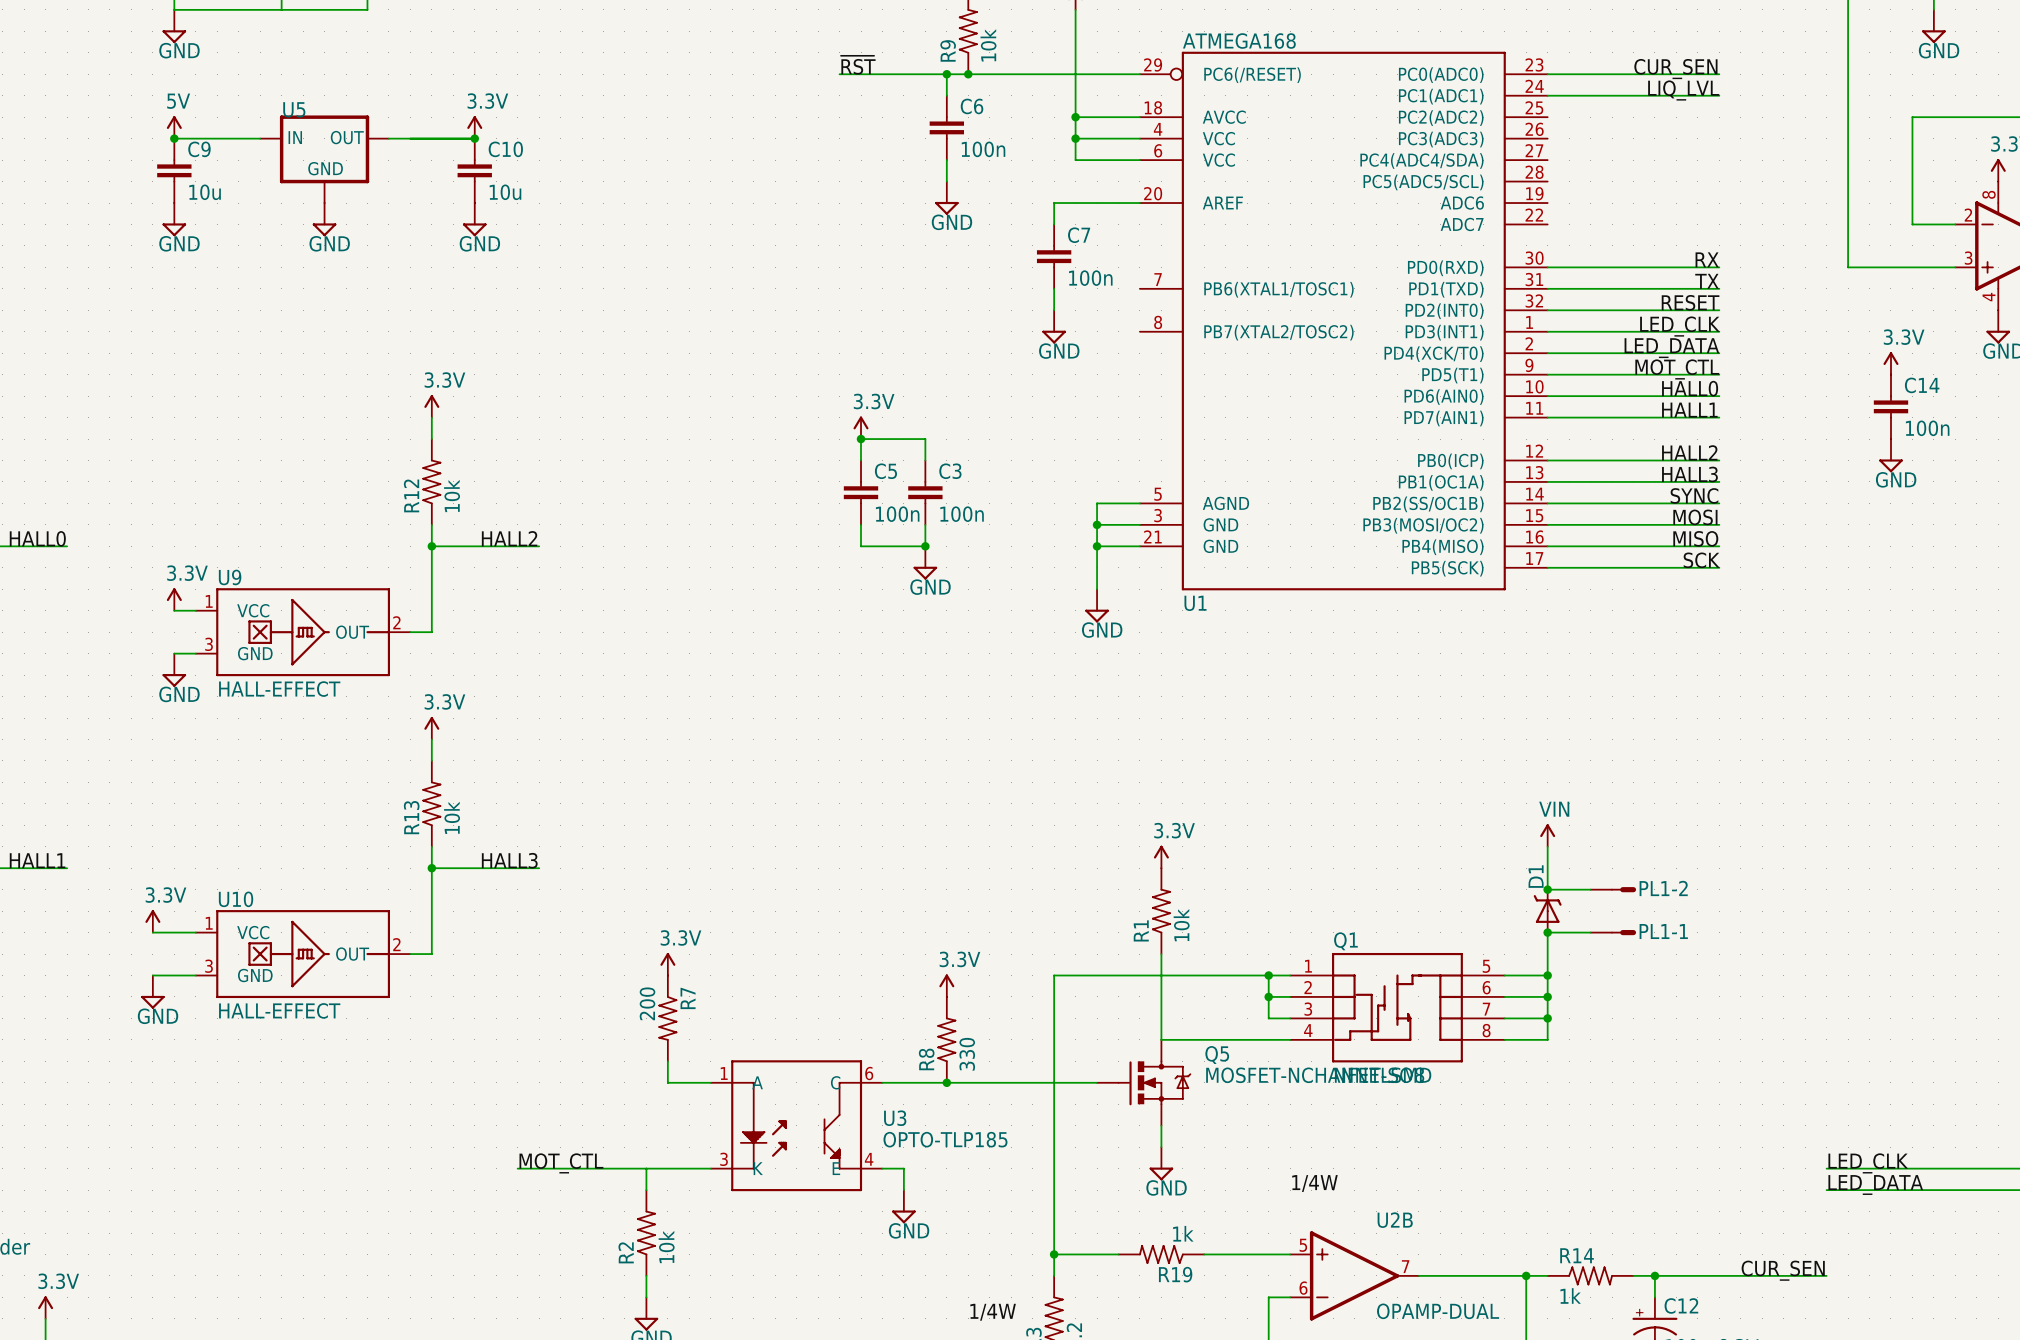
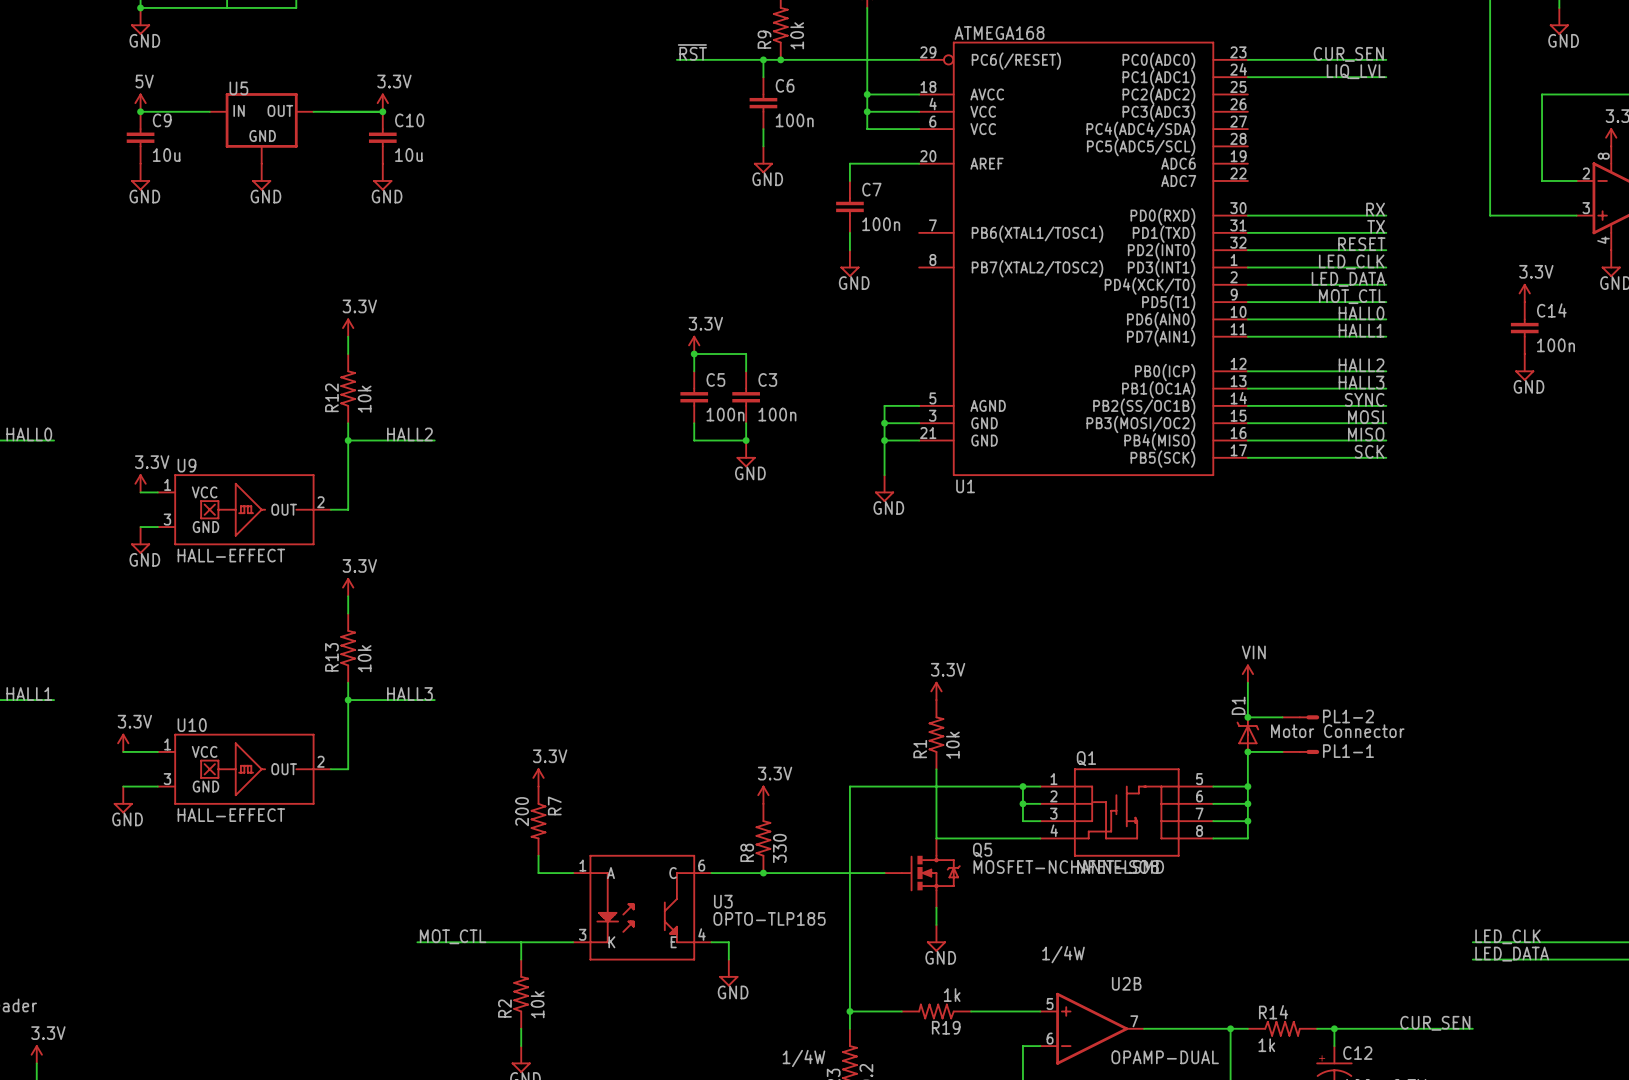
junction: none -> (140, 7)
PL1-1 value: none -> Motor Connector (1337, 731)

